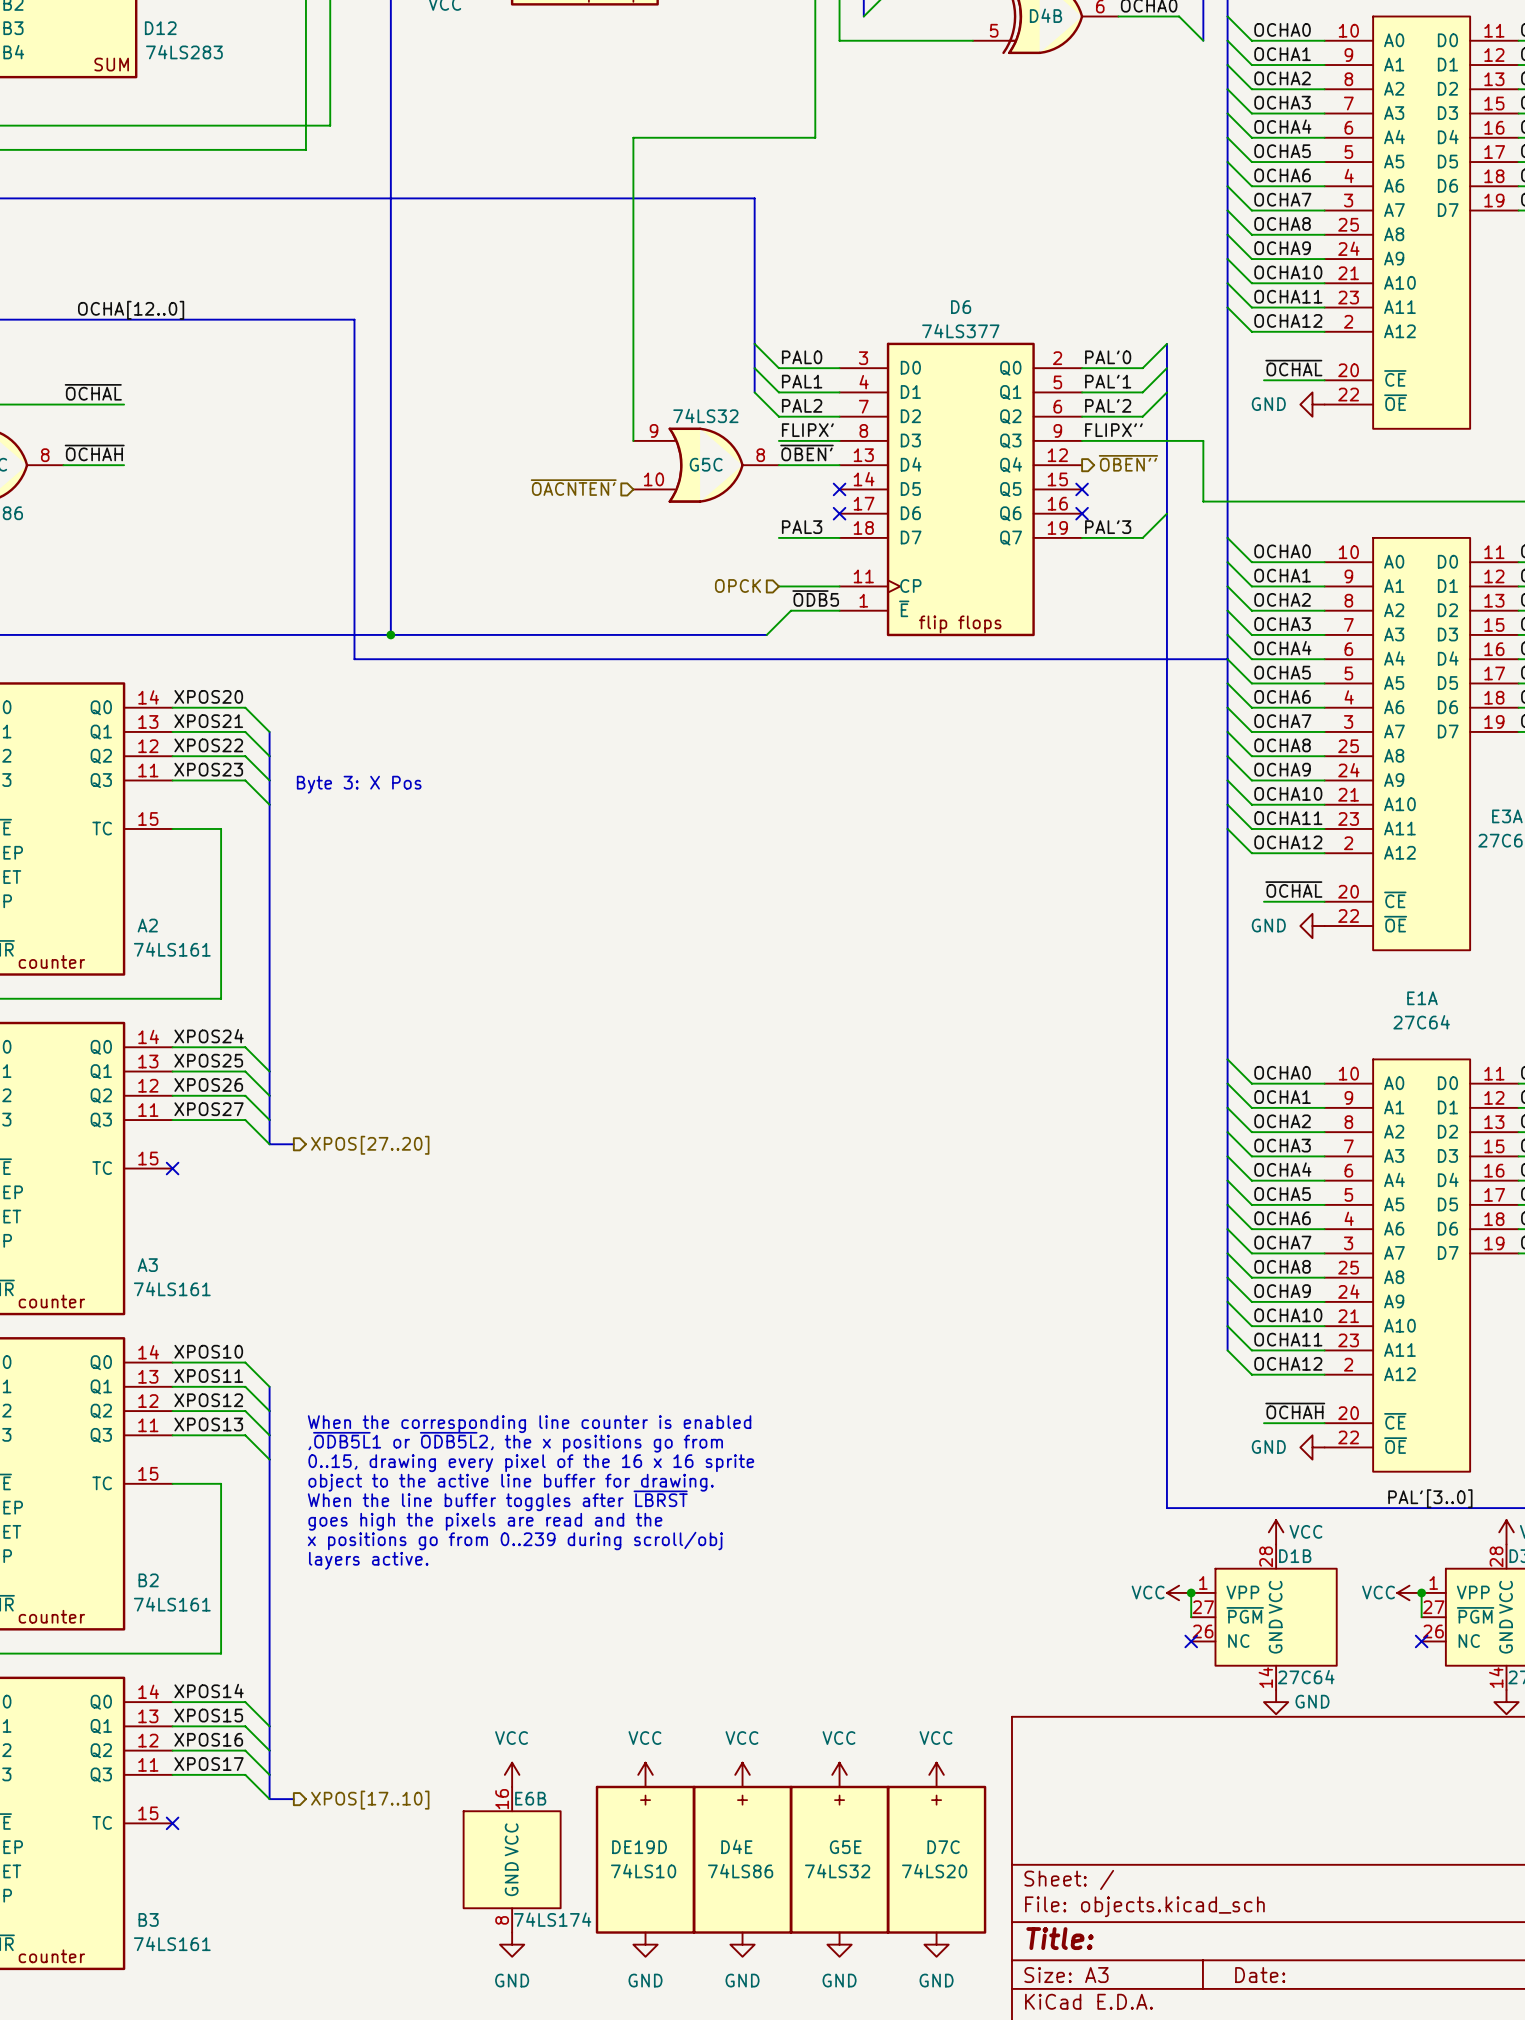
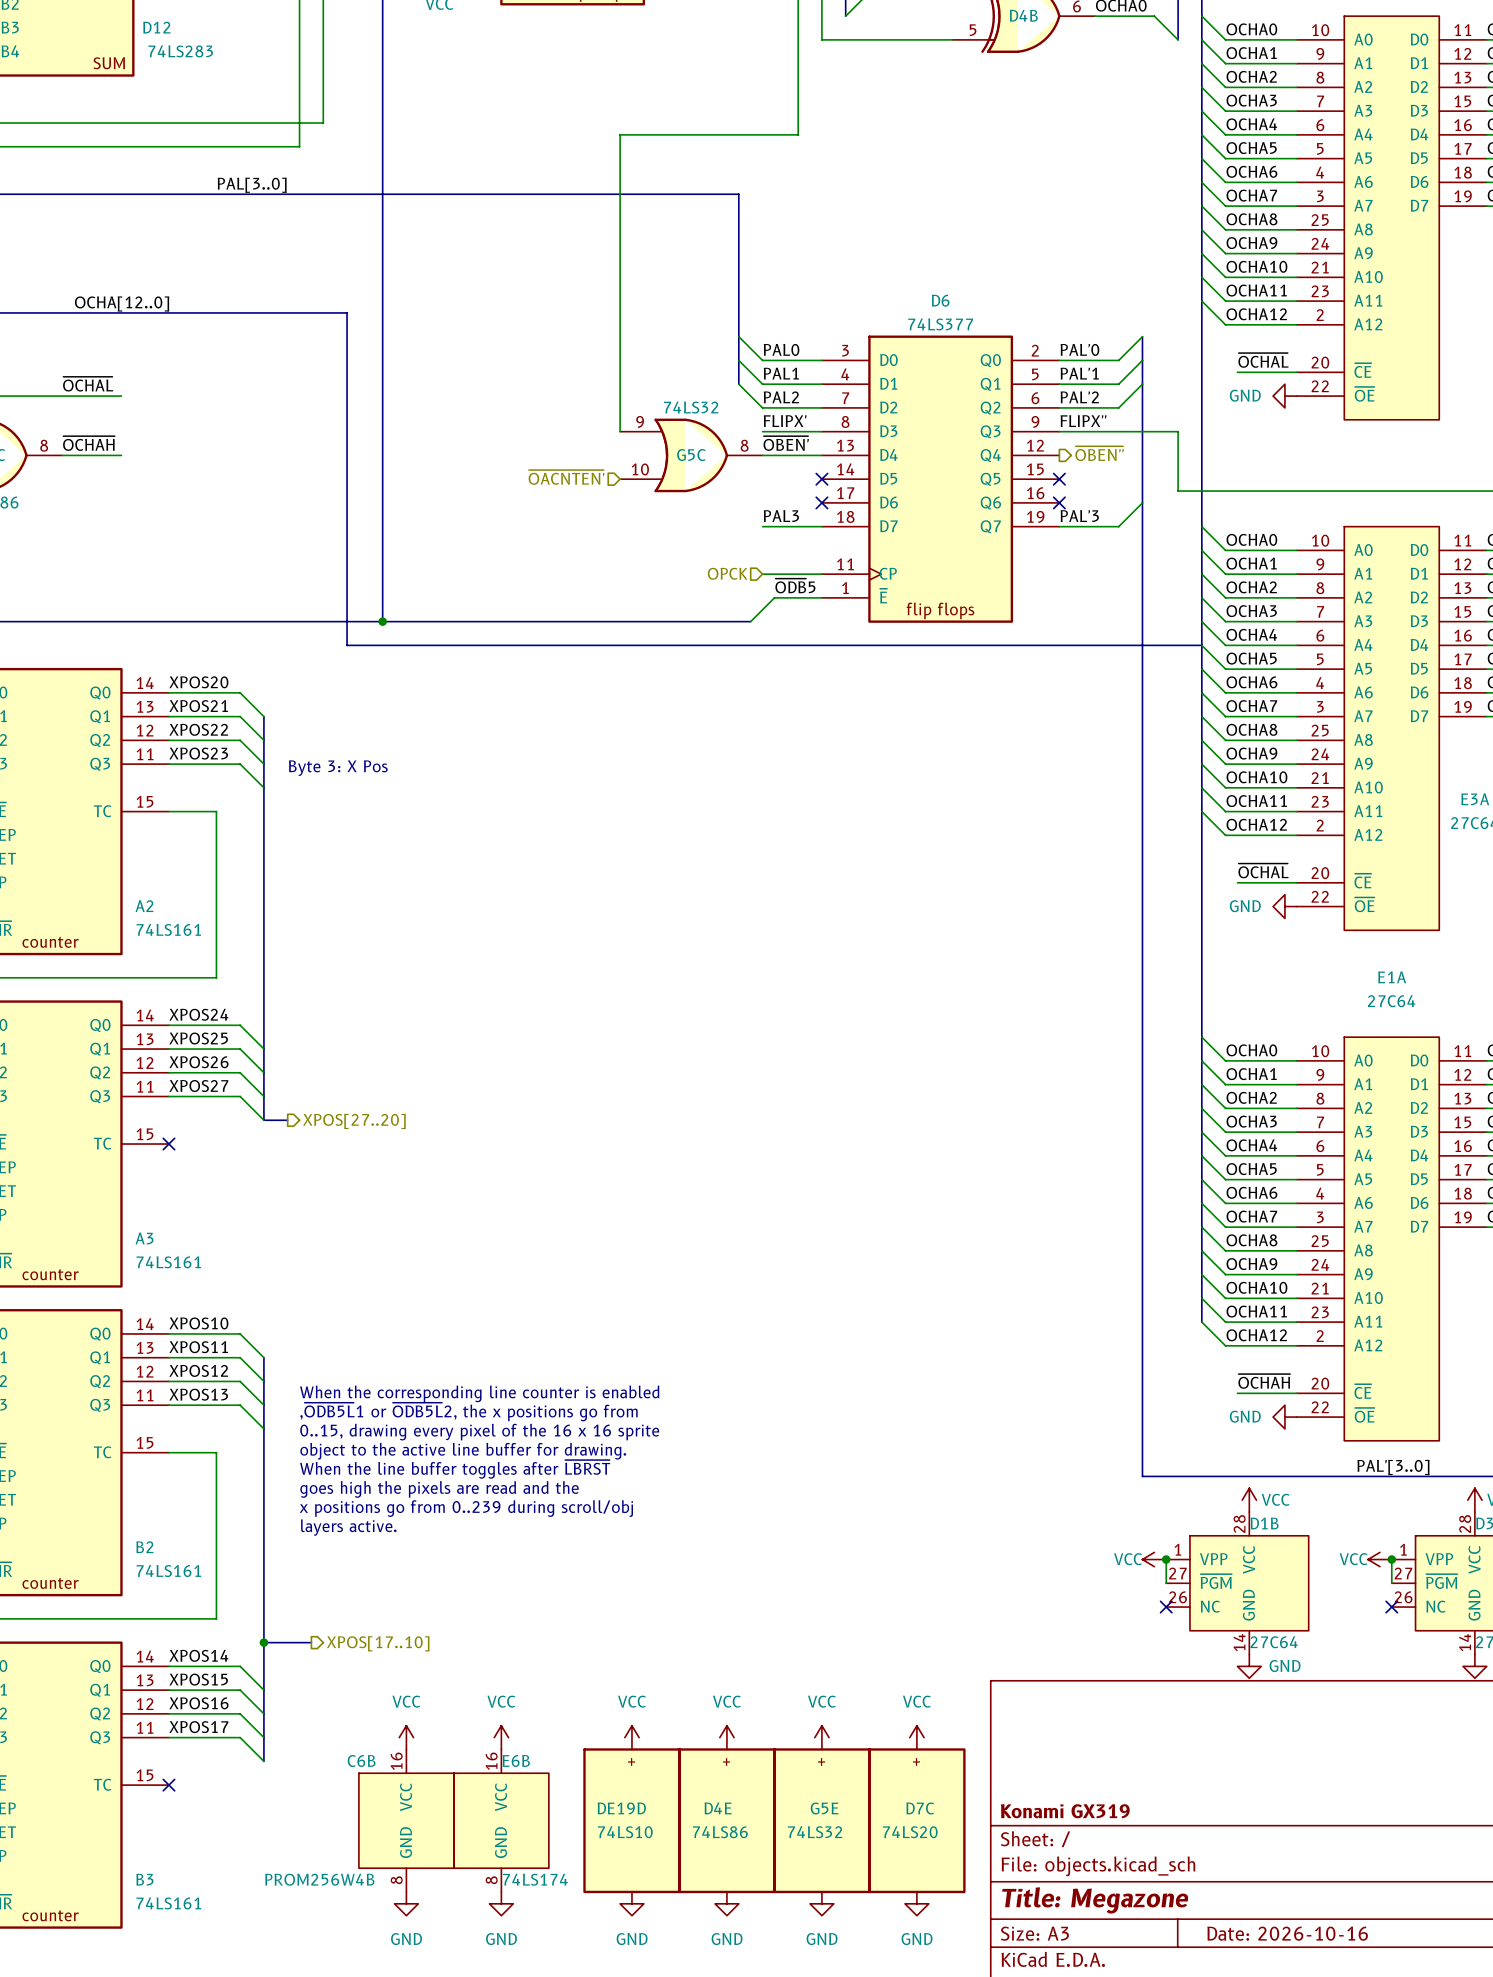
label: none -> PAL[3..0] (252, 185)
bus: none -> (263, 1642) (311, 1642)
junction: none -> (263, 1642)
power symbol: none -> VCC (406, 1737)
bus: (269, 1799) (293, 1799) -> none
hierarchical label position: XPOS[17..10] (370, 1800) -> XPOS[17..10] (378, 1643)
title block: none -> Konami GX319 (1065, 1811)
C6B: none -> PROM256W4B (406, 1820)
title block: Title: (1060, 1938) -> Title: Megazone (1095, 1900)
power symbol: none -> GND (406, 1903)
title block: Date: (1260, 1975) -> Date: 2026-10-16 (1287, 1933)

